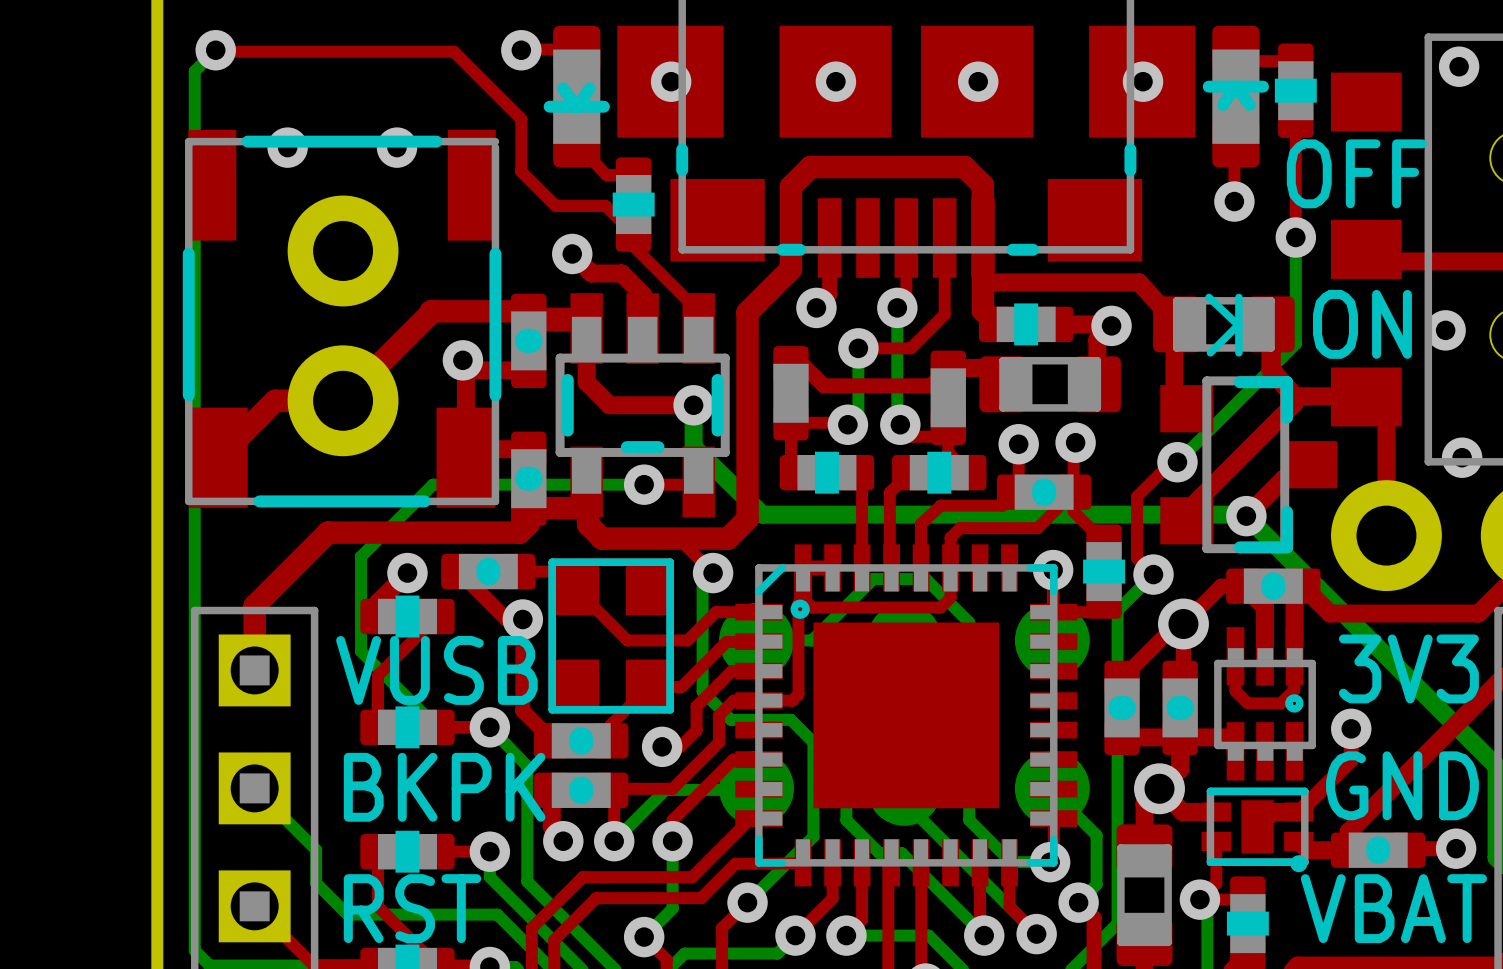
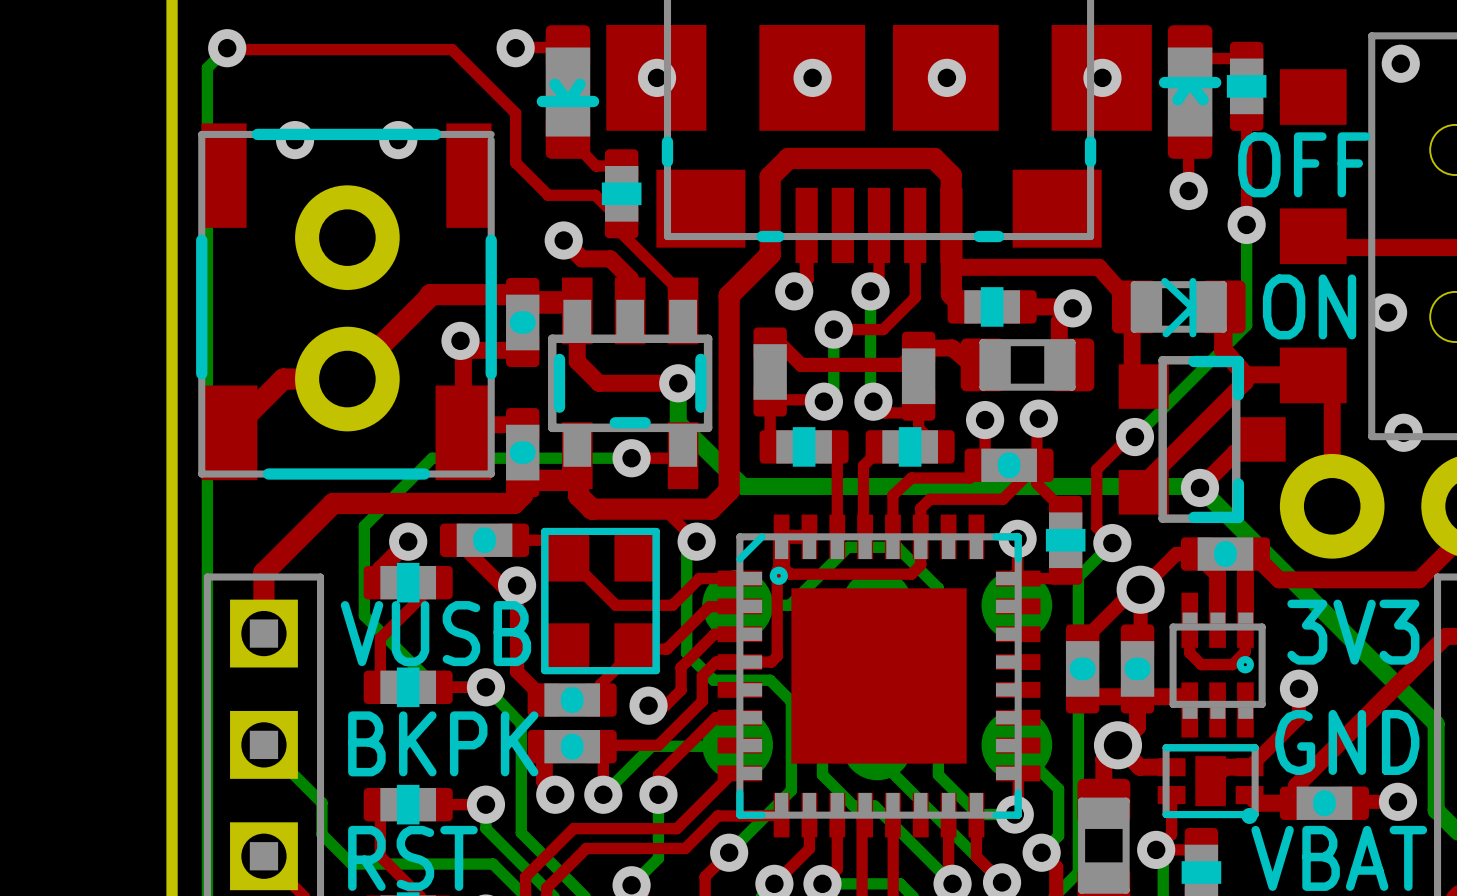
part position: (1050, 384) -> (1027, 364)

